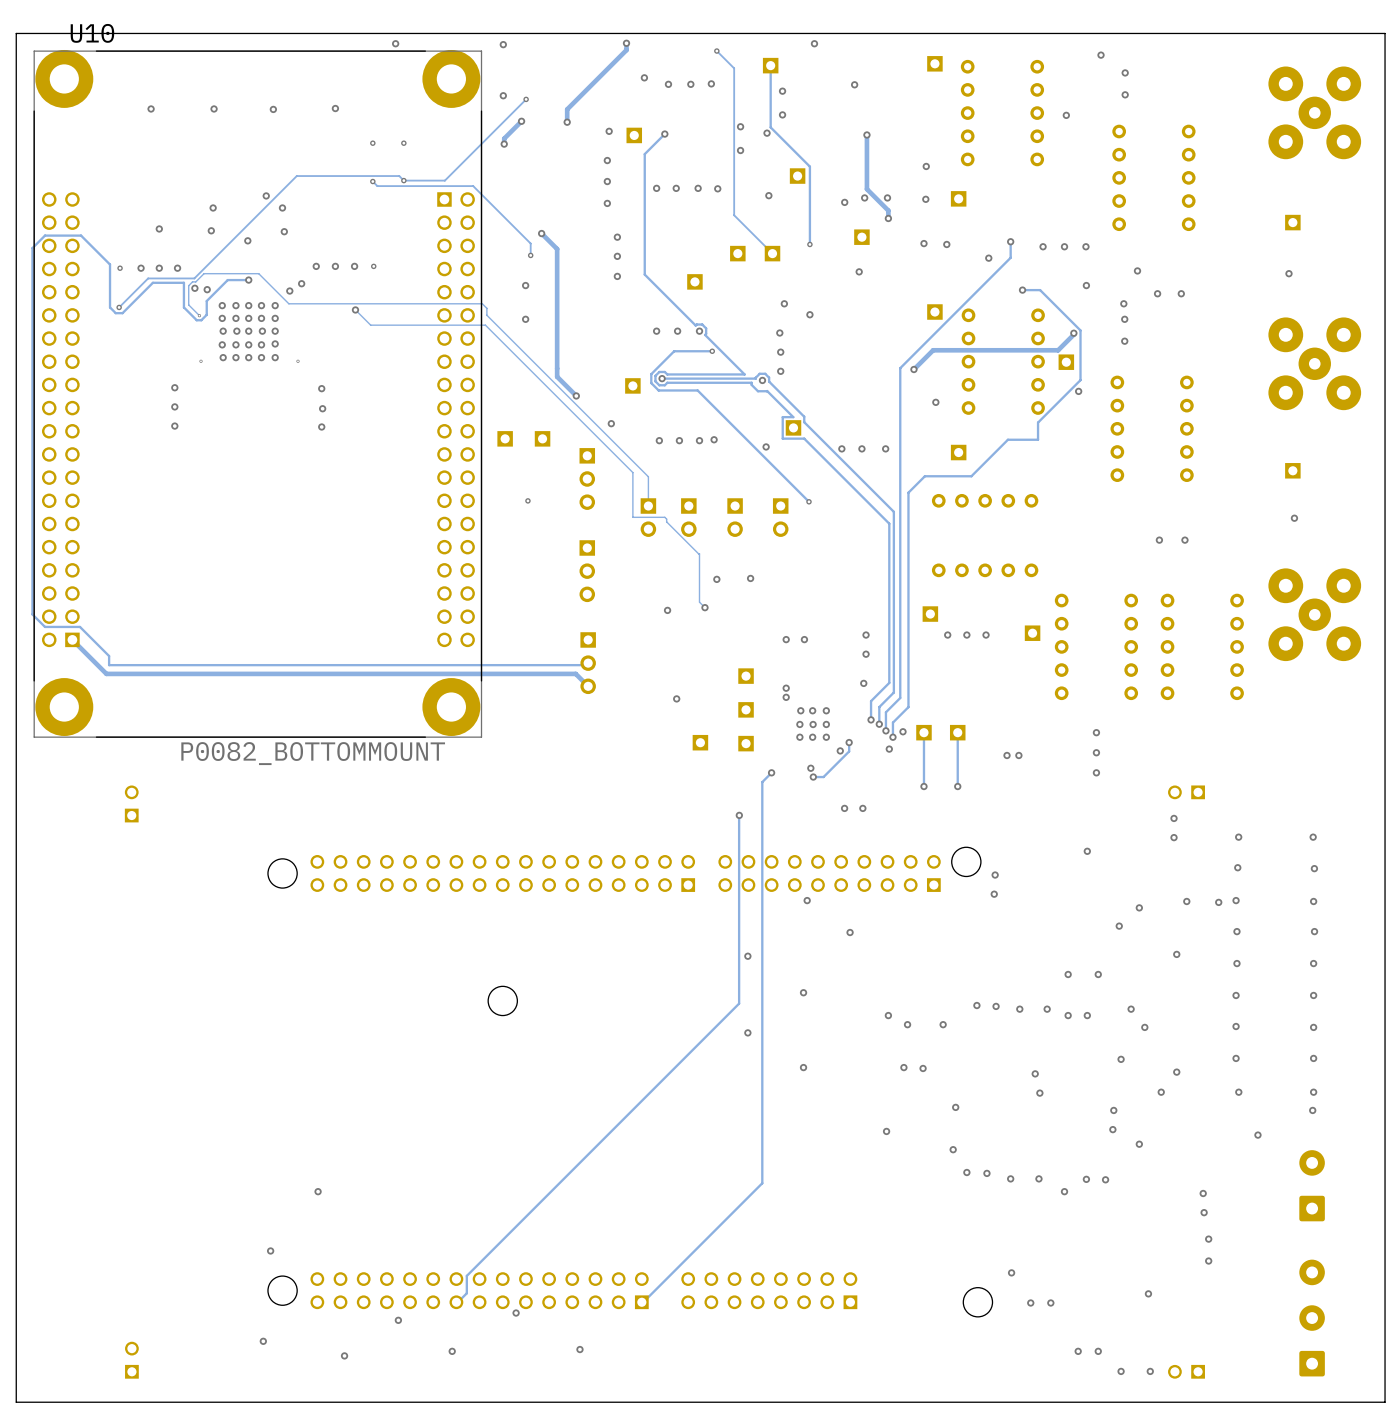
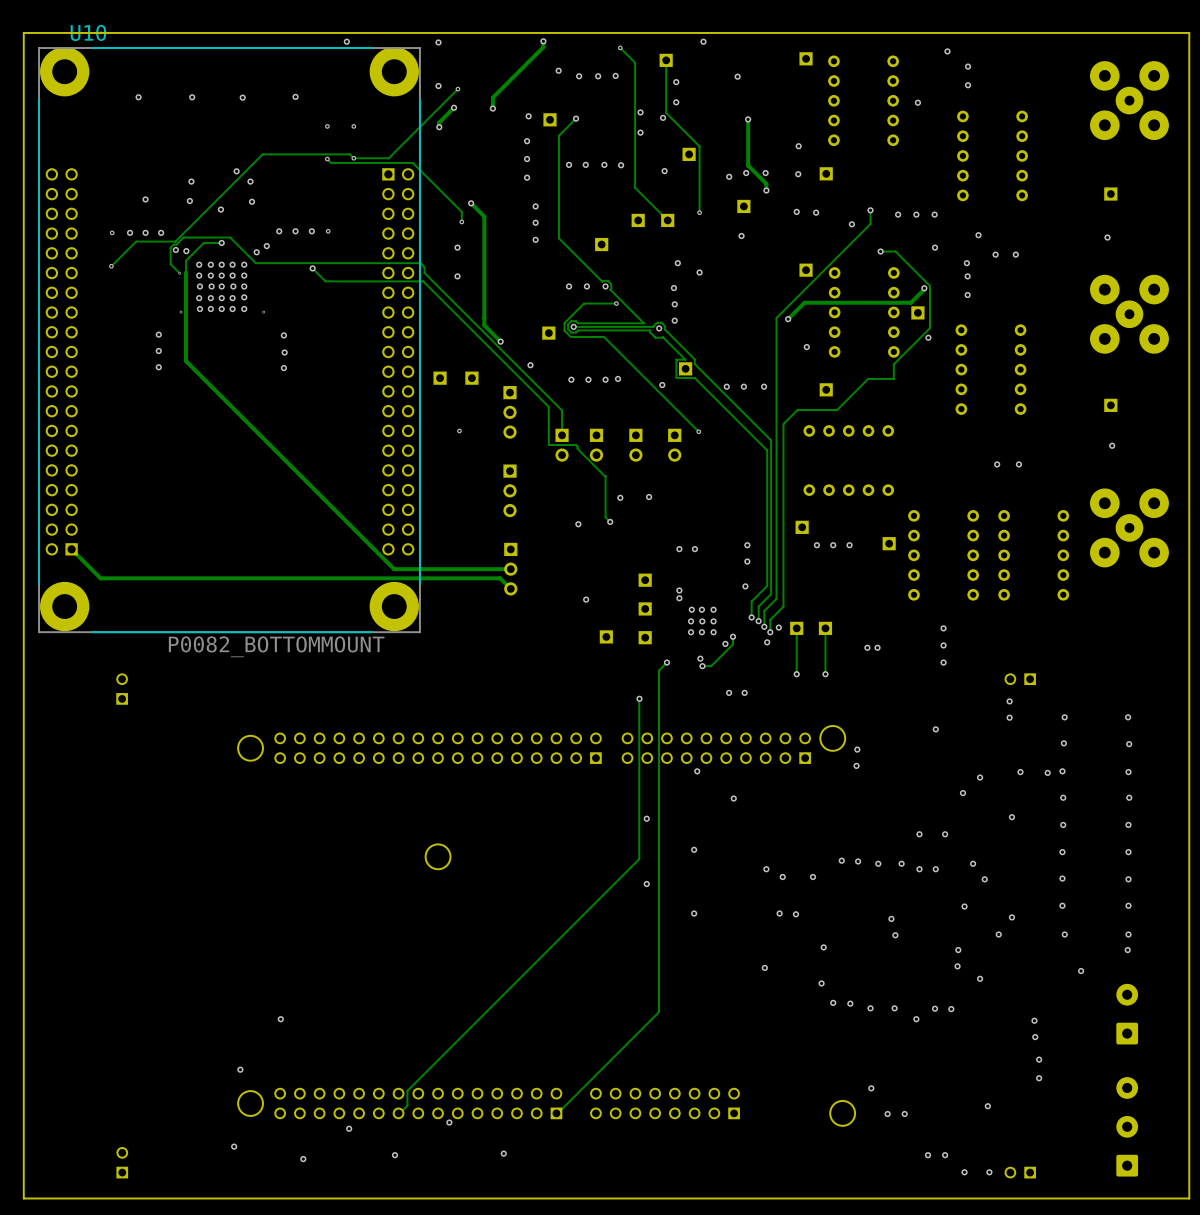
track: (206, 314) (201, 320) (196, 320) (183, 307) (183, 282) (152, 282) (122, 313) (115, 313) (110, 307) (110, 264) (81, 235) (45, 235) (32, 248) (32, 614) (45, 626) (79, 626) (109, 656) (109, 665) (586, 665) (588, 663) -> (185, 272) (185, 361) (394, 569) (510, 569)

